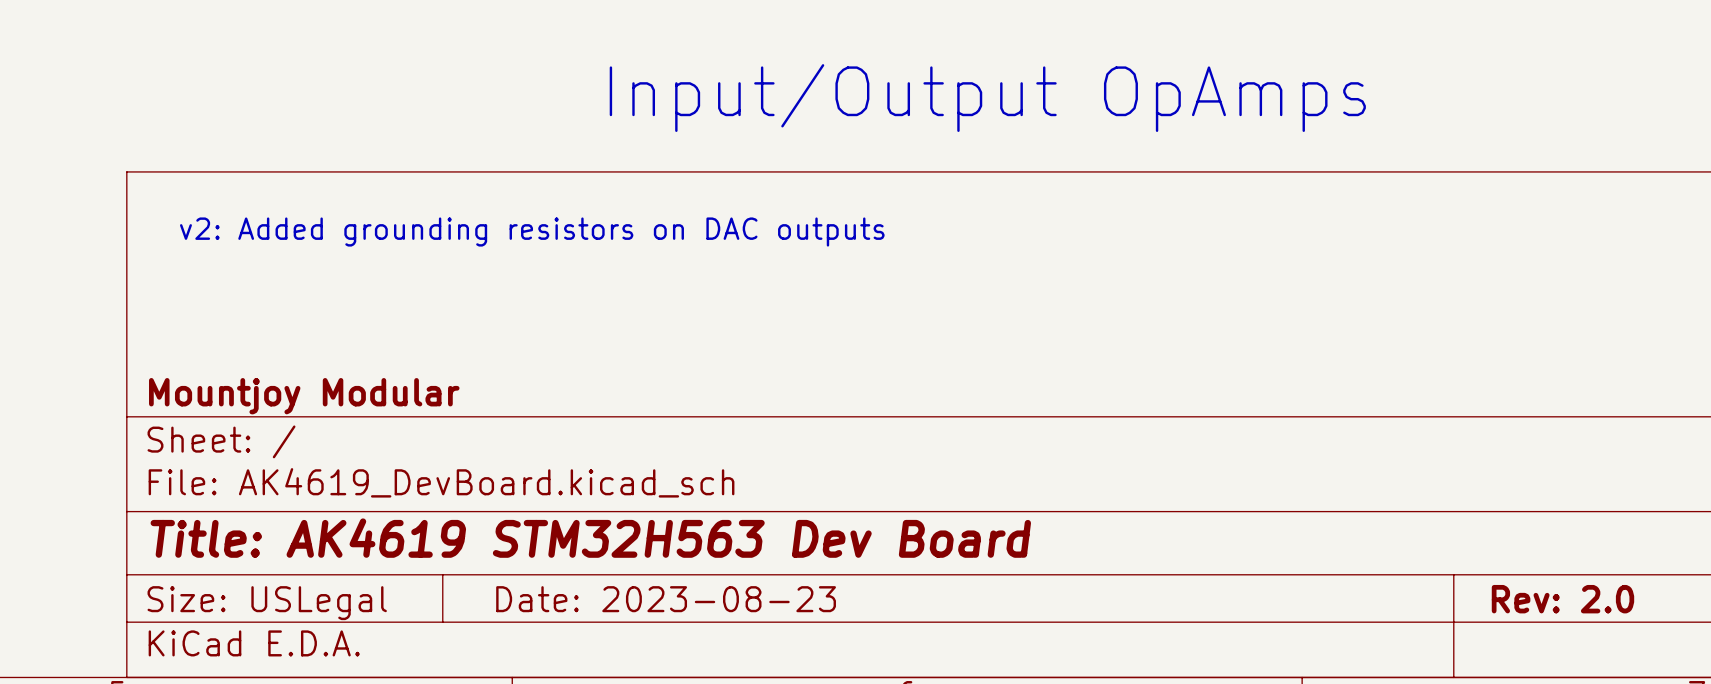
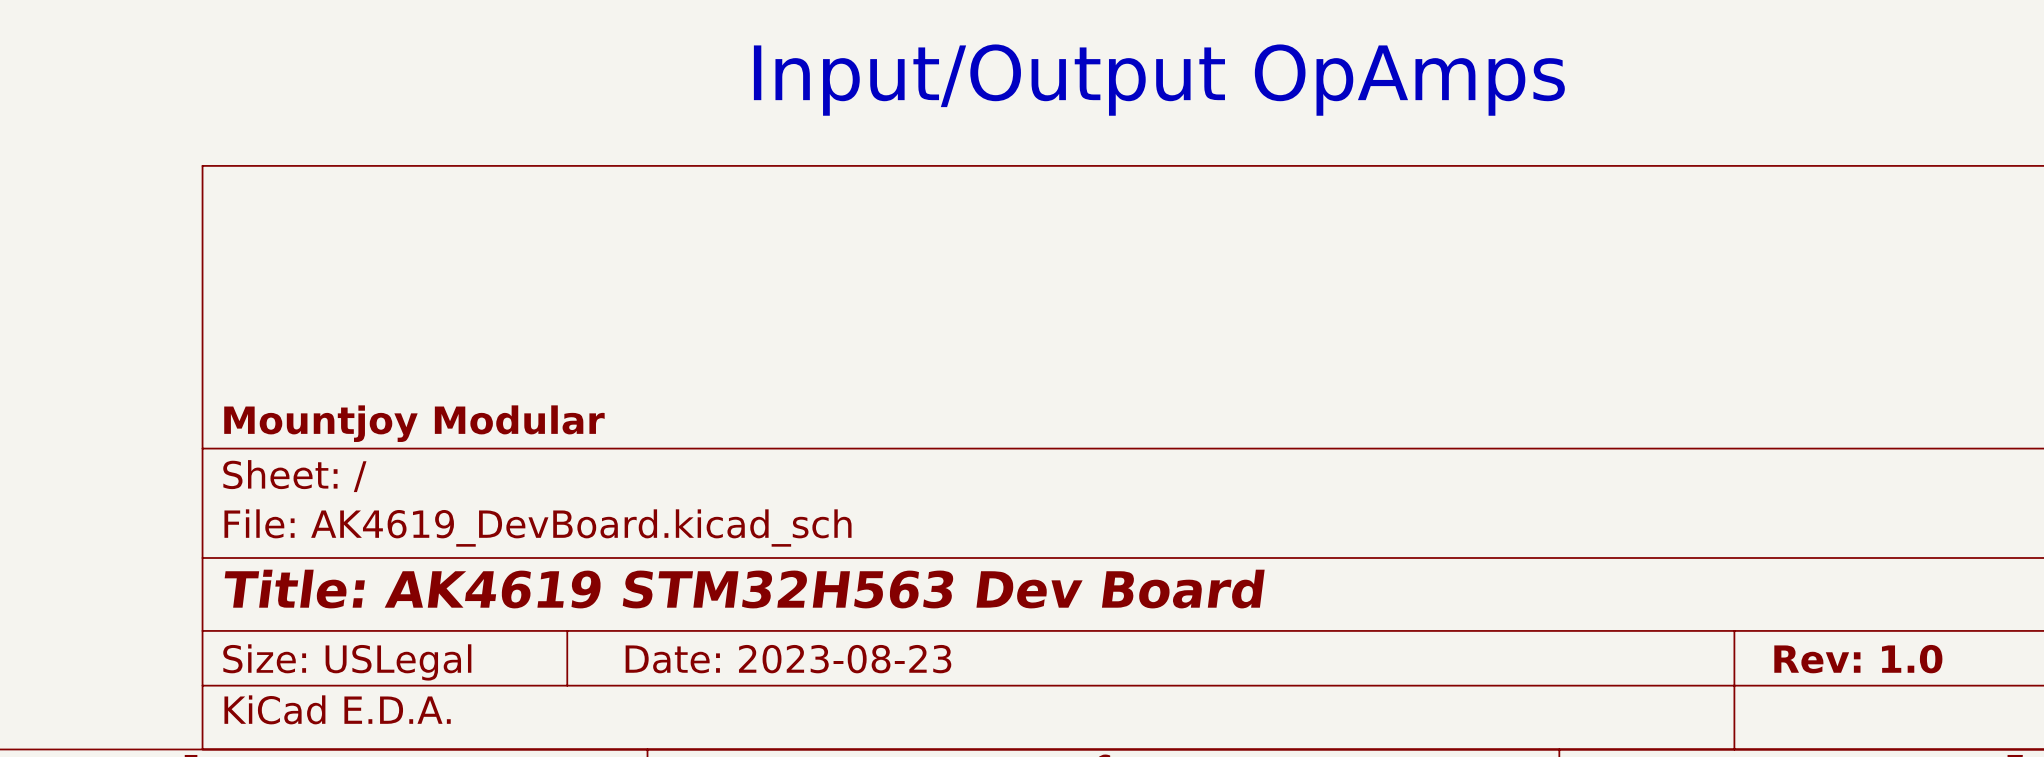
text: v2: Added grounding resistors on DAC outputs (532, 232) -> none
title block: Rev: 2.0 (1562, 599) -> Rev: 1.0 (1858, 659)

